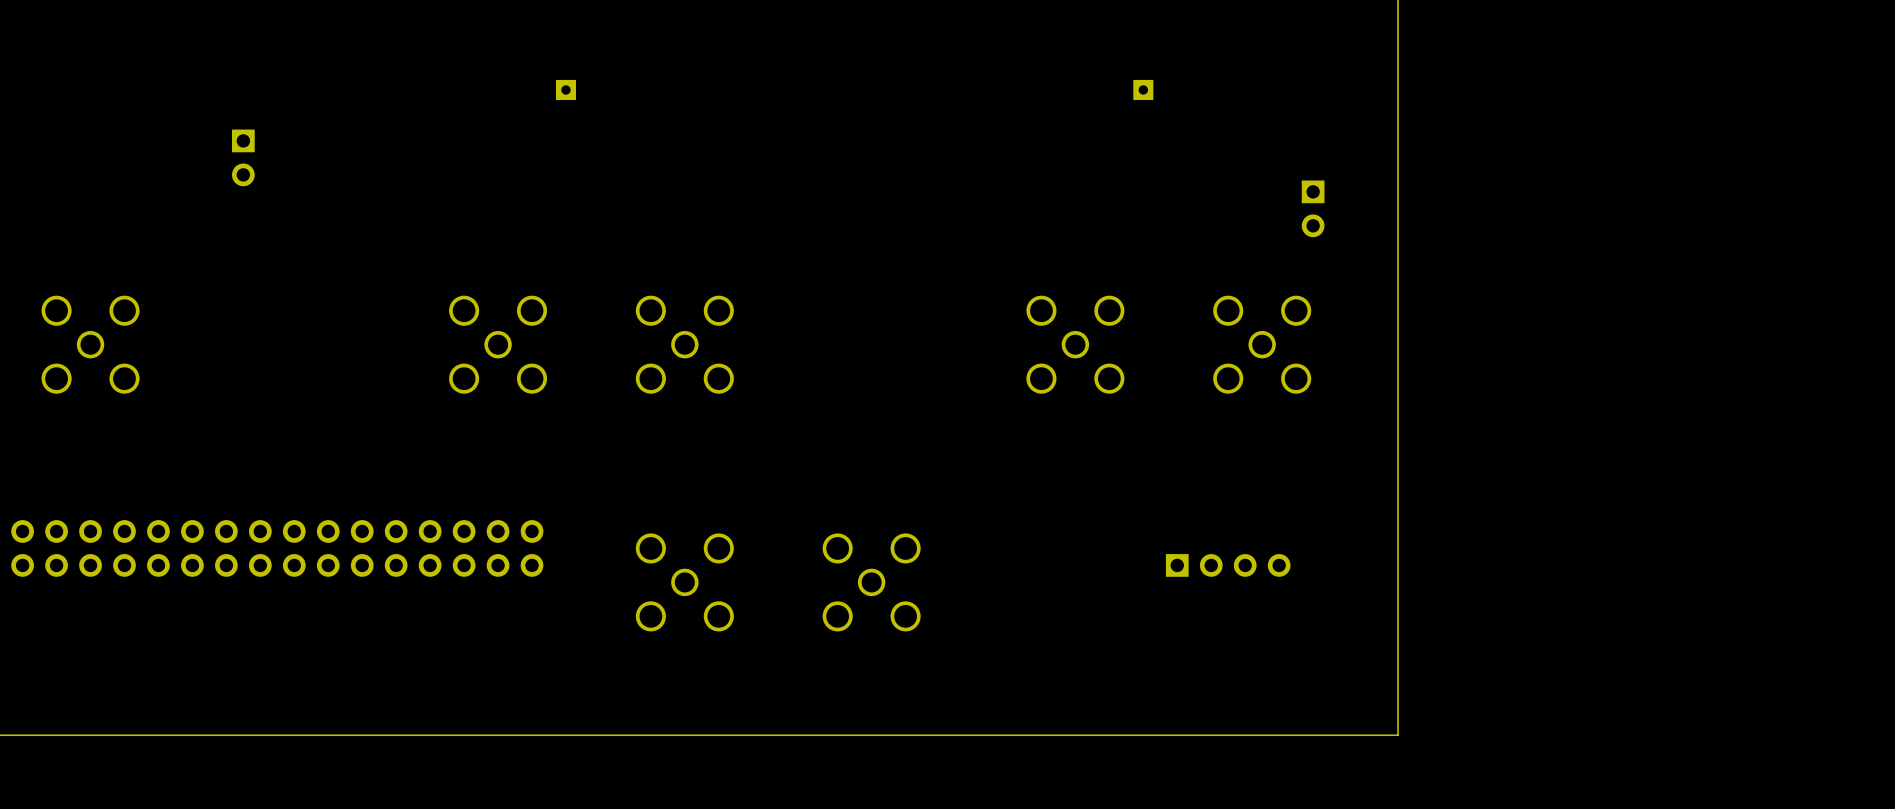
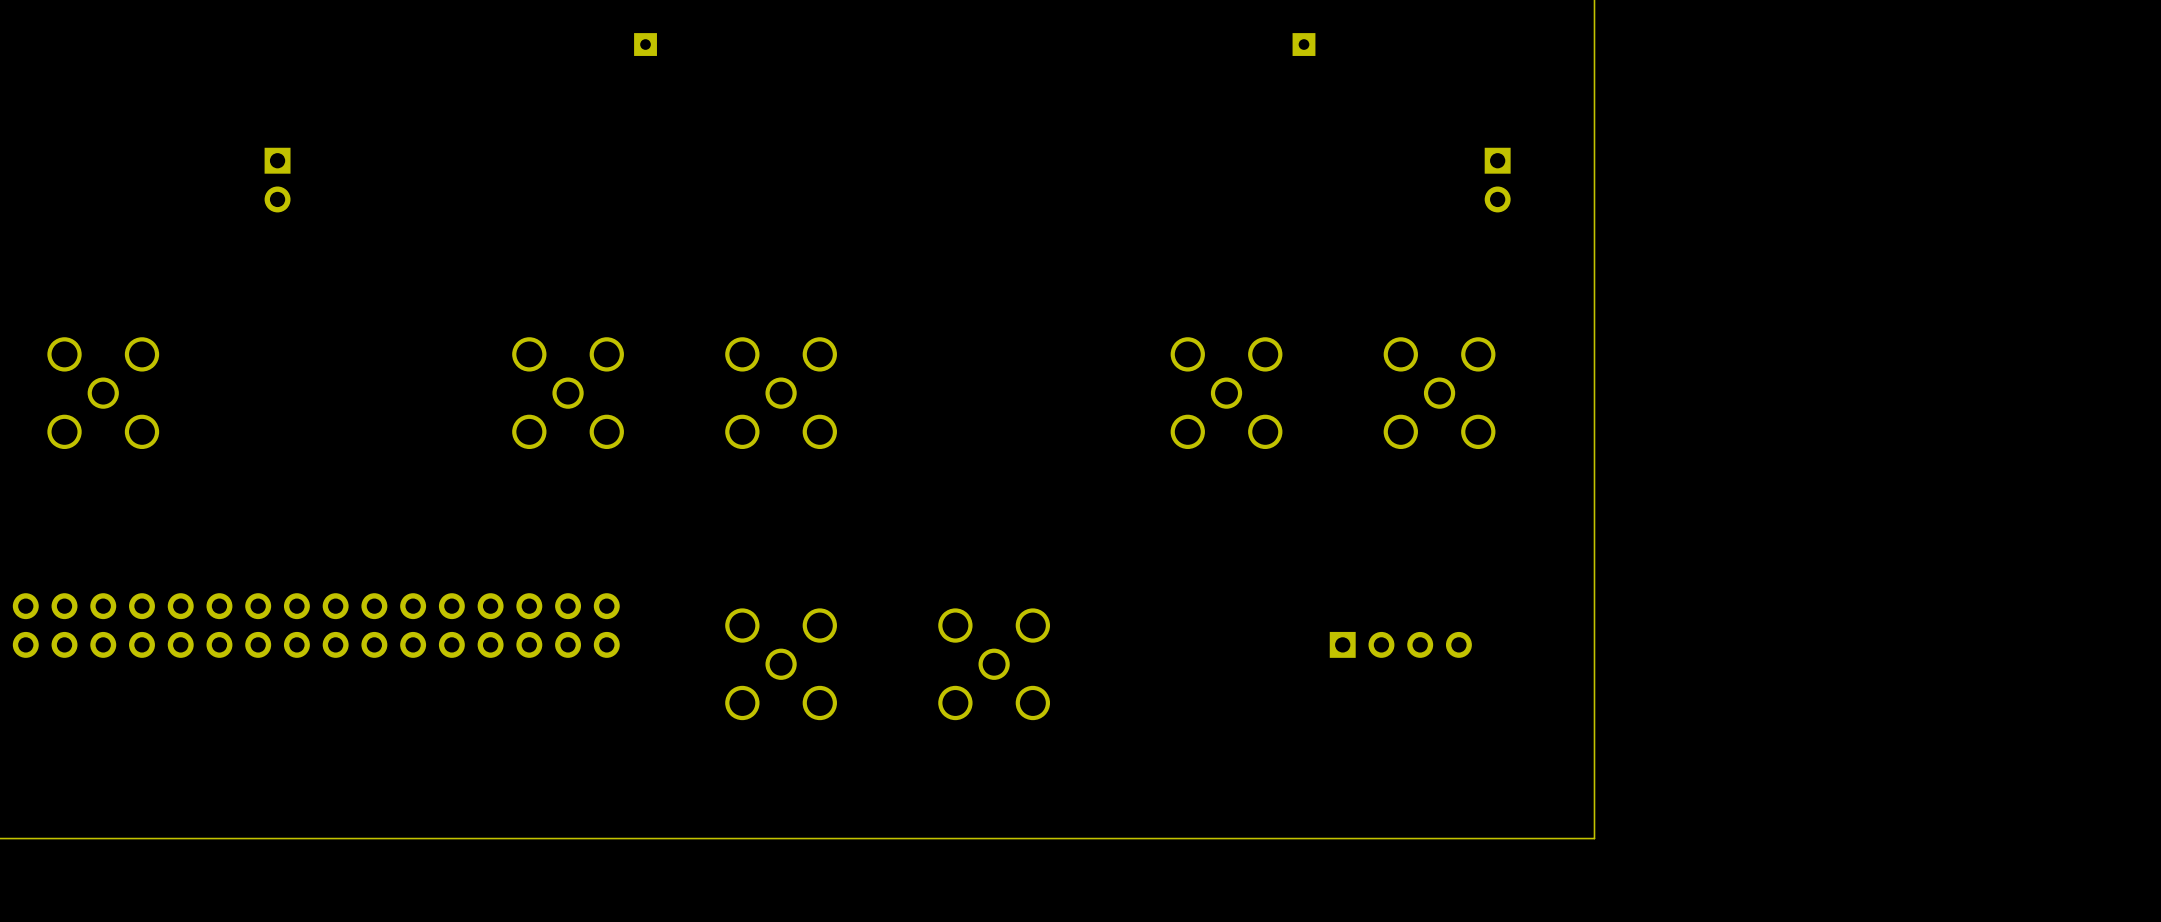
part position: (565, 89) -> (645, 44)
part position: (1143, 89) -> (1303, 44)
part position: (1313, 208) -> (1497, 180)

